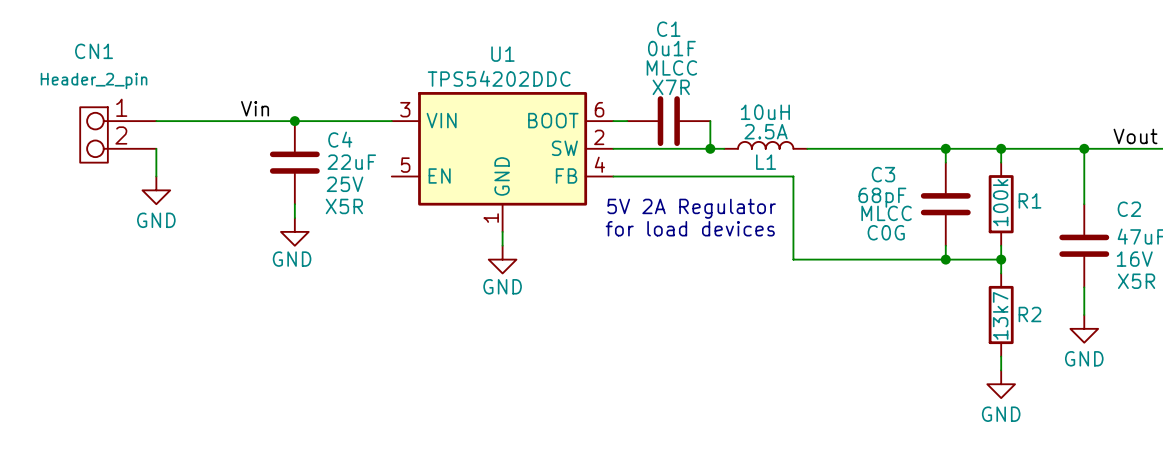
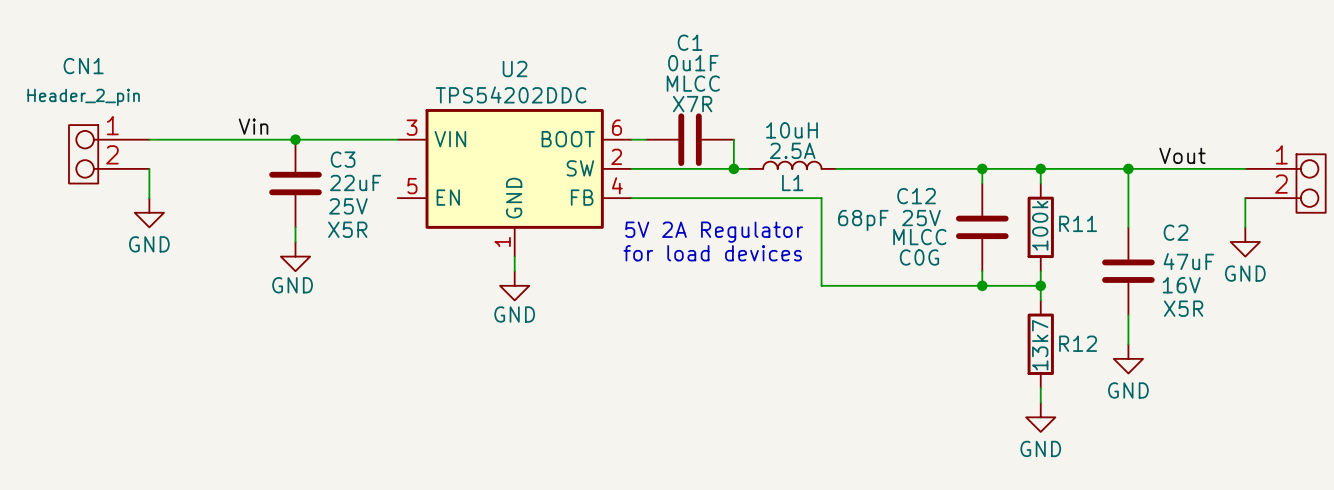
U1 name: U1 (502, 54) -> U2 (515, 69)
C4 name: C4 (340, 139) -> C3 (343, 159)
C3 name: C3 (883, 174) -> C12 (916, 196)
C3 value: 68pF (882, 197) -> 68pF 25V (889, 220)
R1 name: R1 (1029, 200) -> R11 (1078, 223)
R2 name: R2 (1029, 314) -> R12 (1078, 343)

